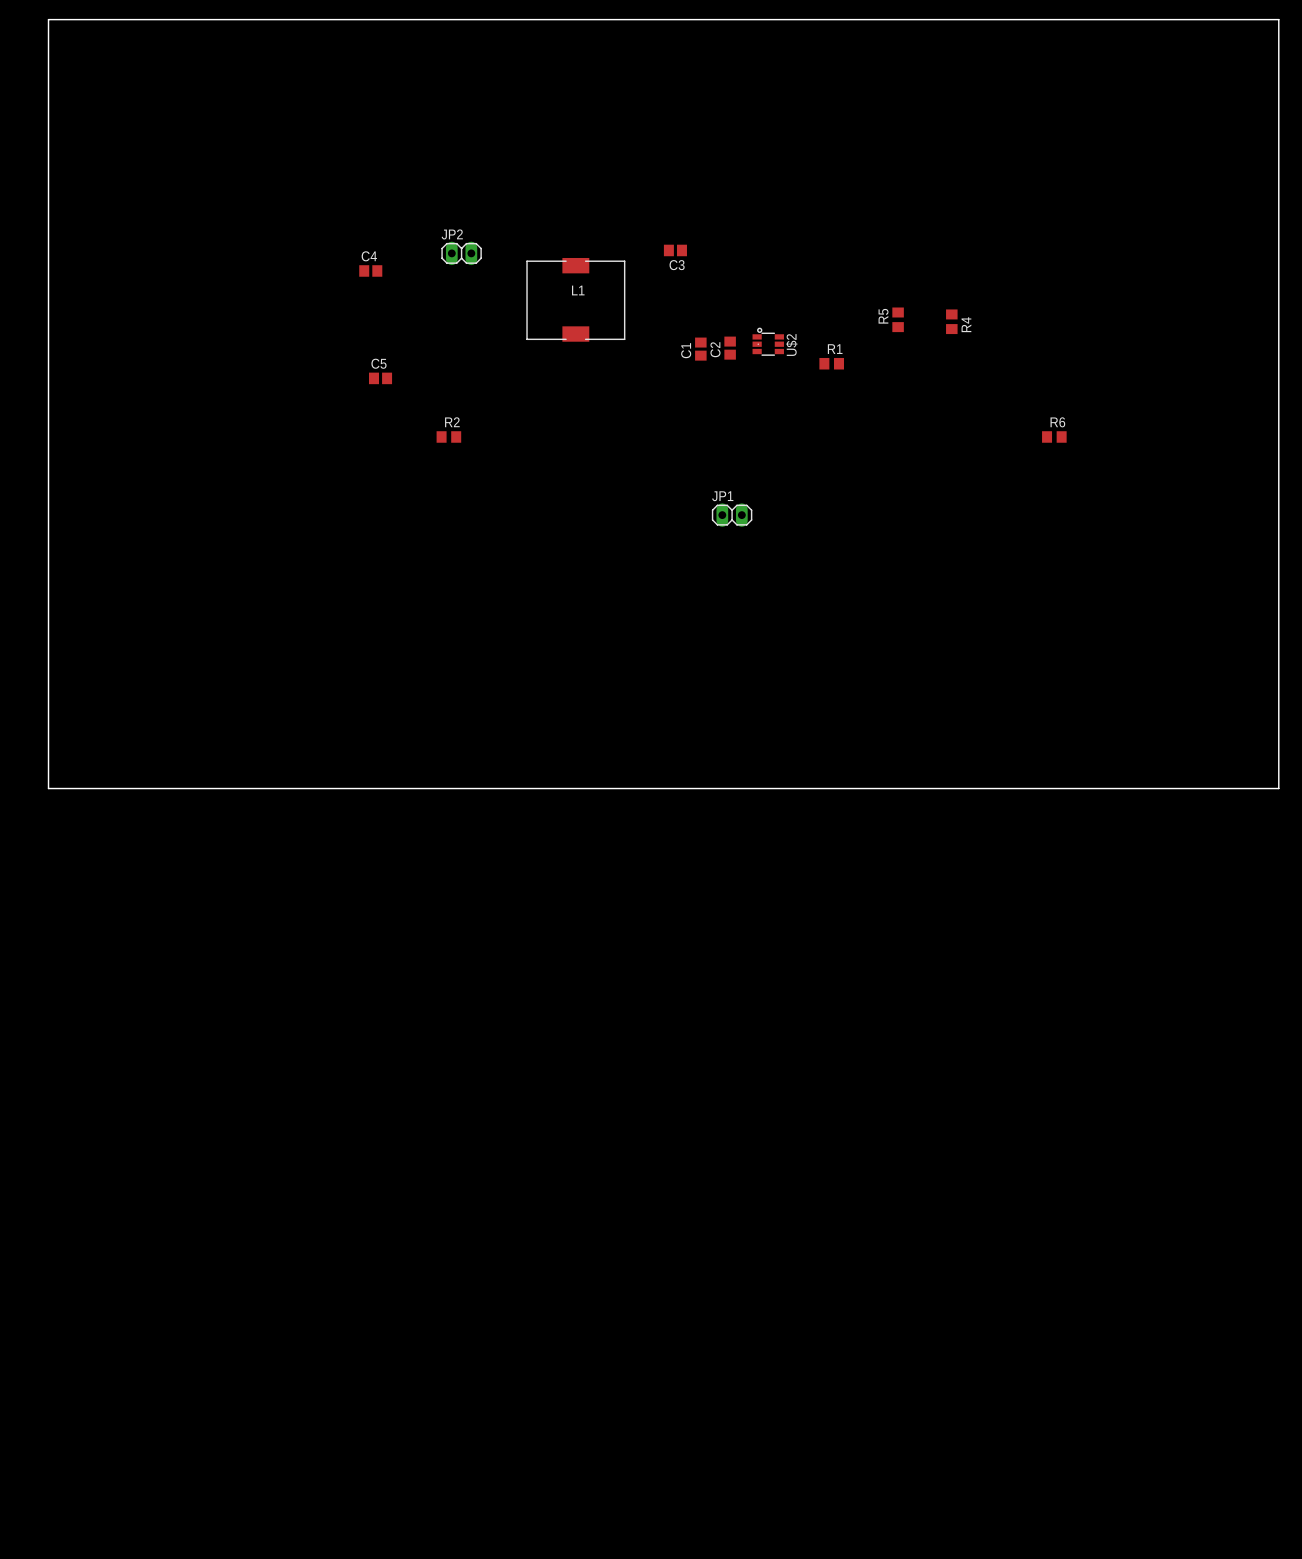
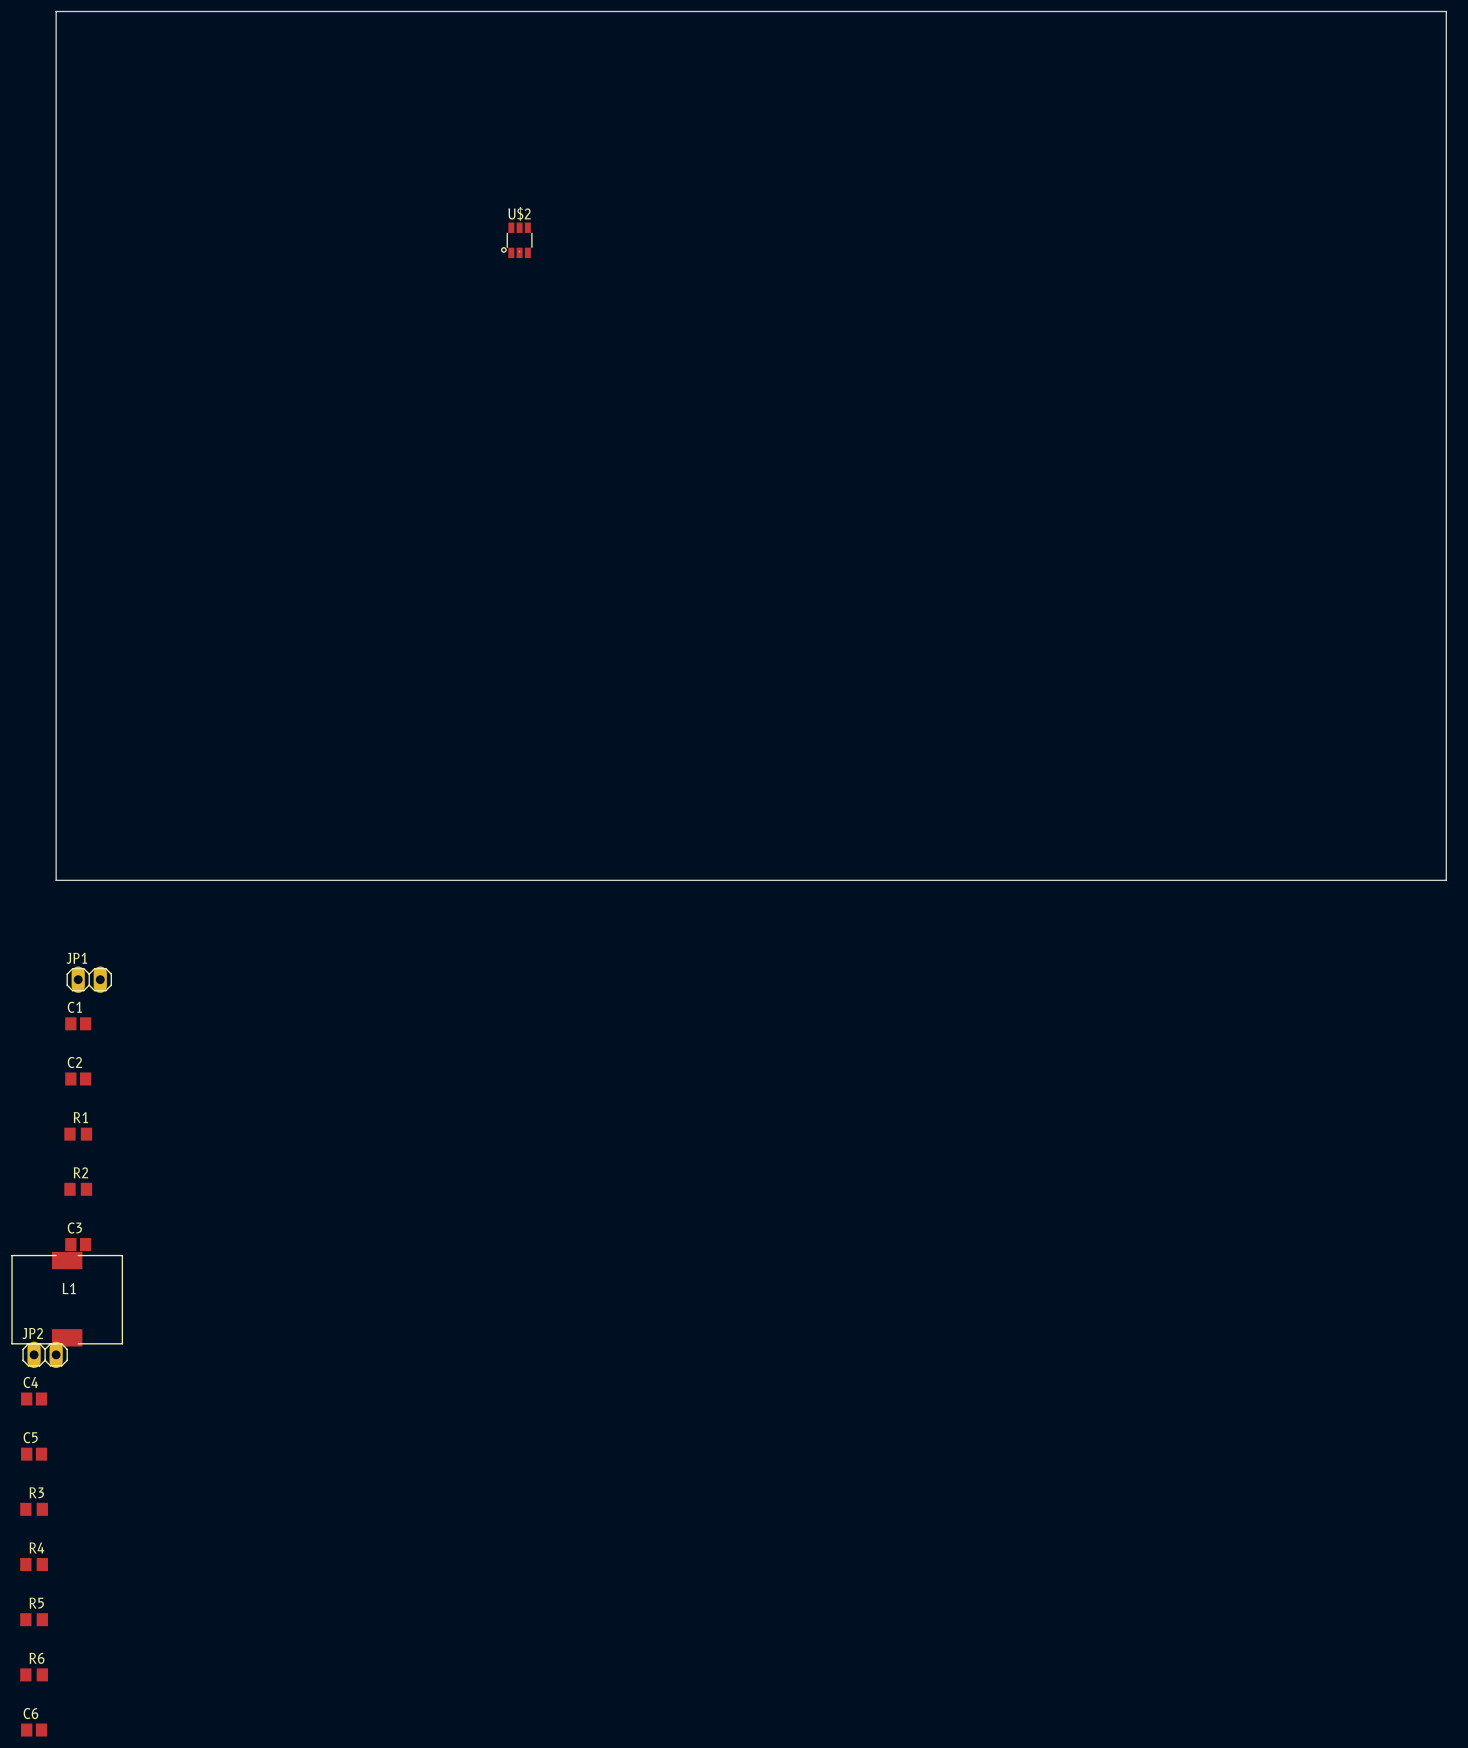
C3 position: (675, 250) -> (78, 1244)
JP2 position: (461, 253) -> (45, 1354)
C3 name position: C3 (677, 265) -> C3 (74, 1228)
C4 position: (370, 270) -> (34, 1398)
L1 position: (575, 299) -> (67, 1299)
R5 rotation: 0° (898, 319) -> 90° clockwise (34, 1619)
R5 position: (898, 319) -> (34, 1619)
R4 rotation: 0° (951, 321) -> 90° clockwise (34, 1564)
R4 position: (951, 321) -> (34, 1564)
R4 name position: R4 (966, 324) -> R4 (36, 1547)
U$2 rotation: 0° (768, 341) -> 90° counterclockwise (516, 240)
U$2 position: (768, 341) -> (516, 240)
C2 rotation: 0° (730, 348) -> 90° clockwise (78, 1078)
C2 position: (730, 348) -> (78, 1078)
C1 rotation: 0° (700, 349) -> 90° clockwise (78, 1023)
C1 position: (700, 349) -> (78, 1023)
R1 position: (831, 363) -> (78, 1134)
C5 position: (380, 378) -> (34, 1454)
R2 position: (448, 436) -> (78, 1189)
R6 position: (1054, 436) -> (34, 1674)
JP1 position: (732, 515) -> (89, 979)
R3: none -> (34, 1509)
C6: none -> (34, 1730)

